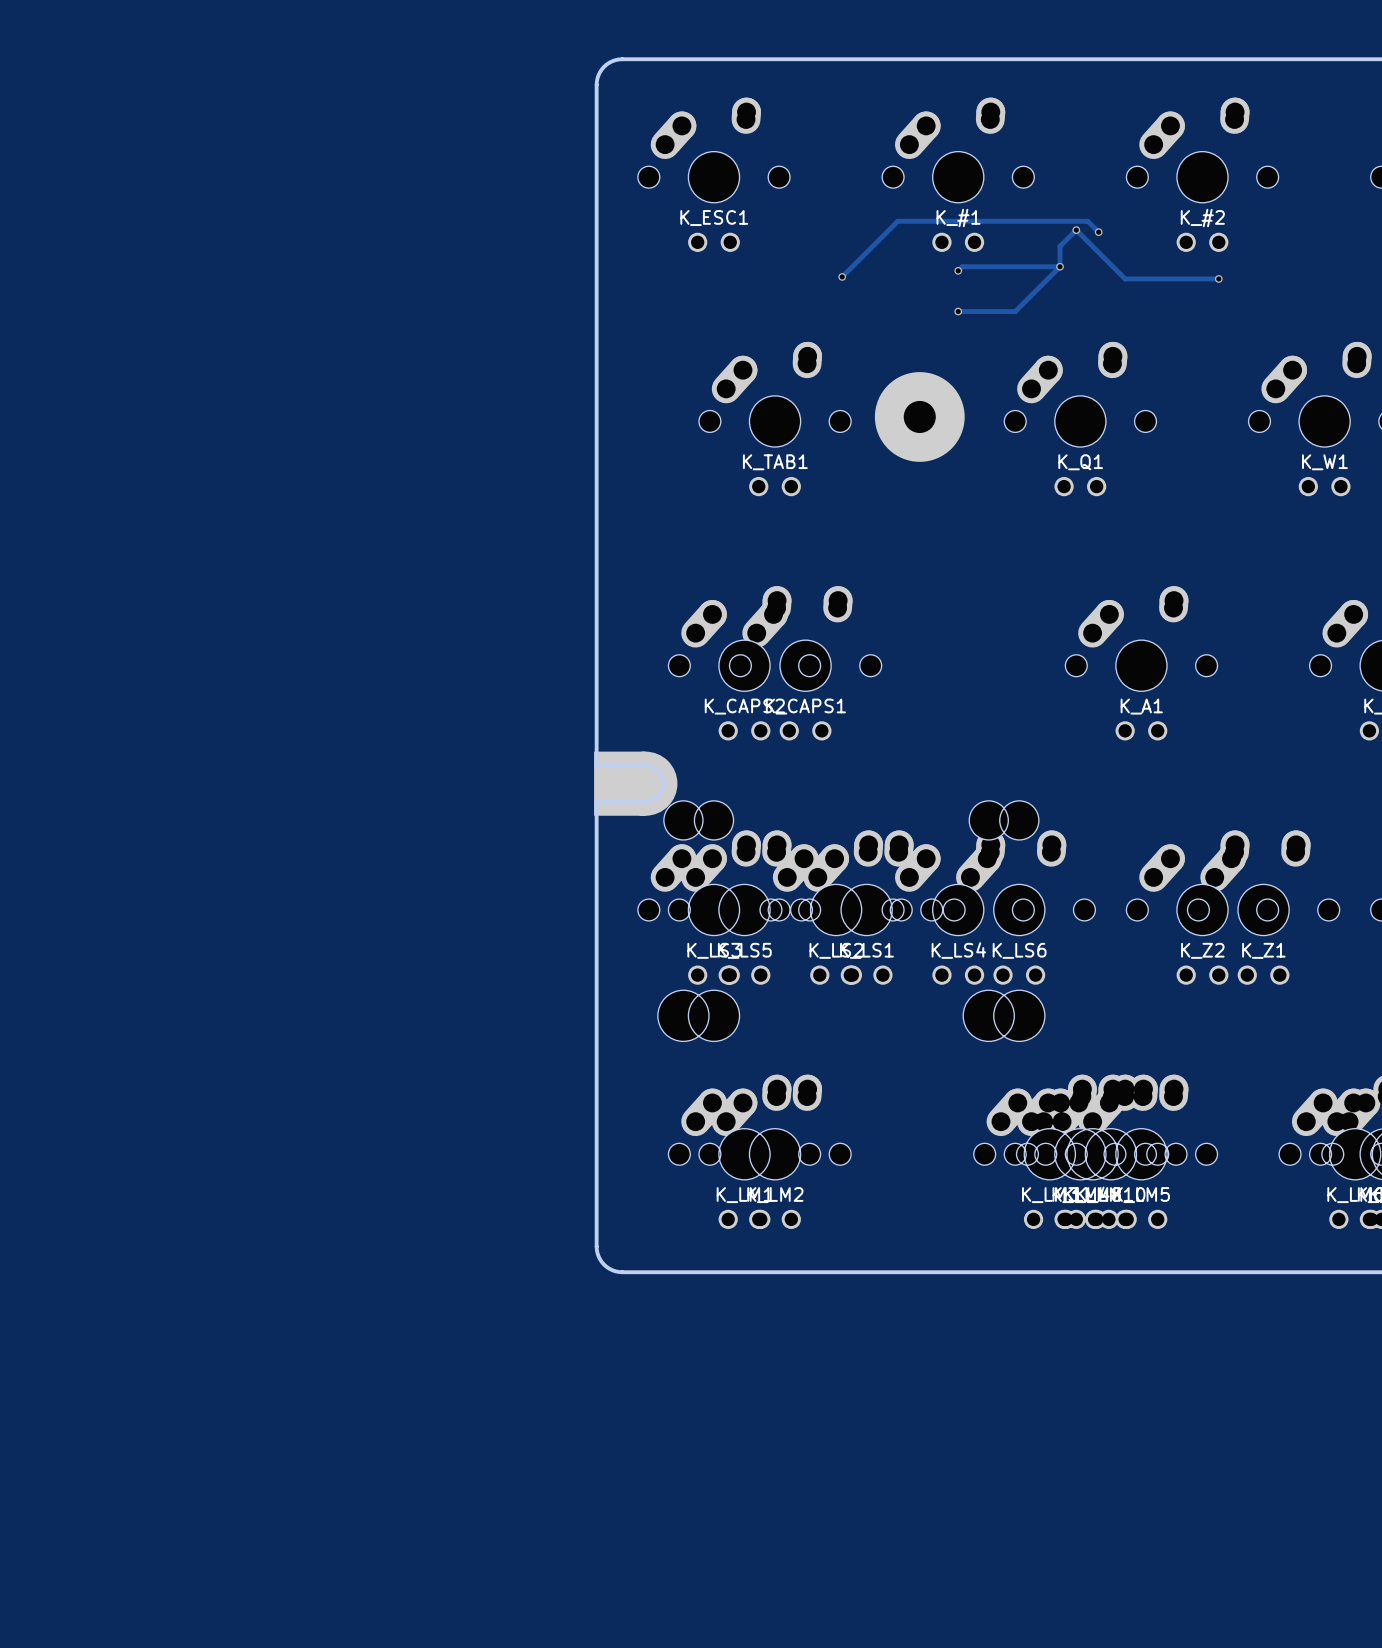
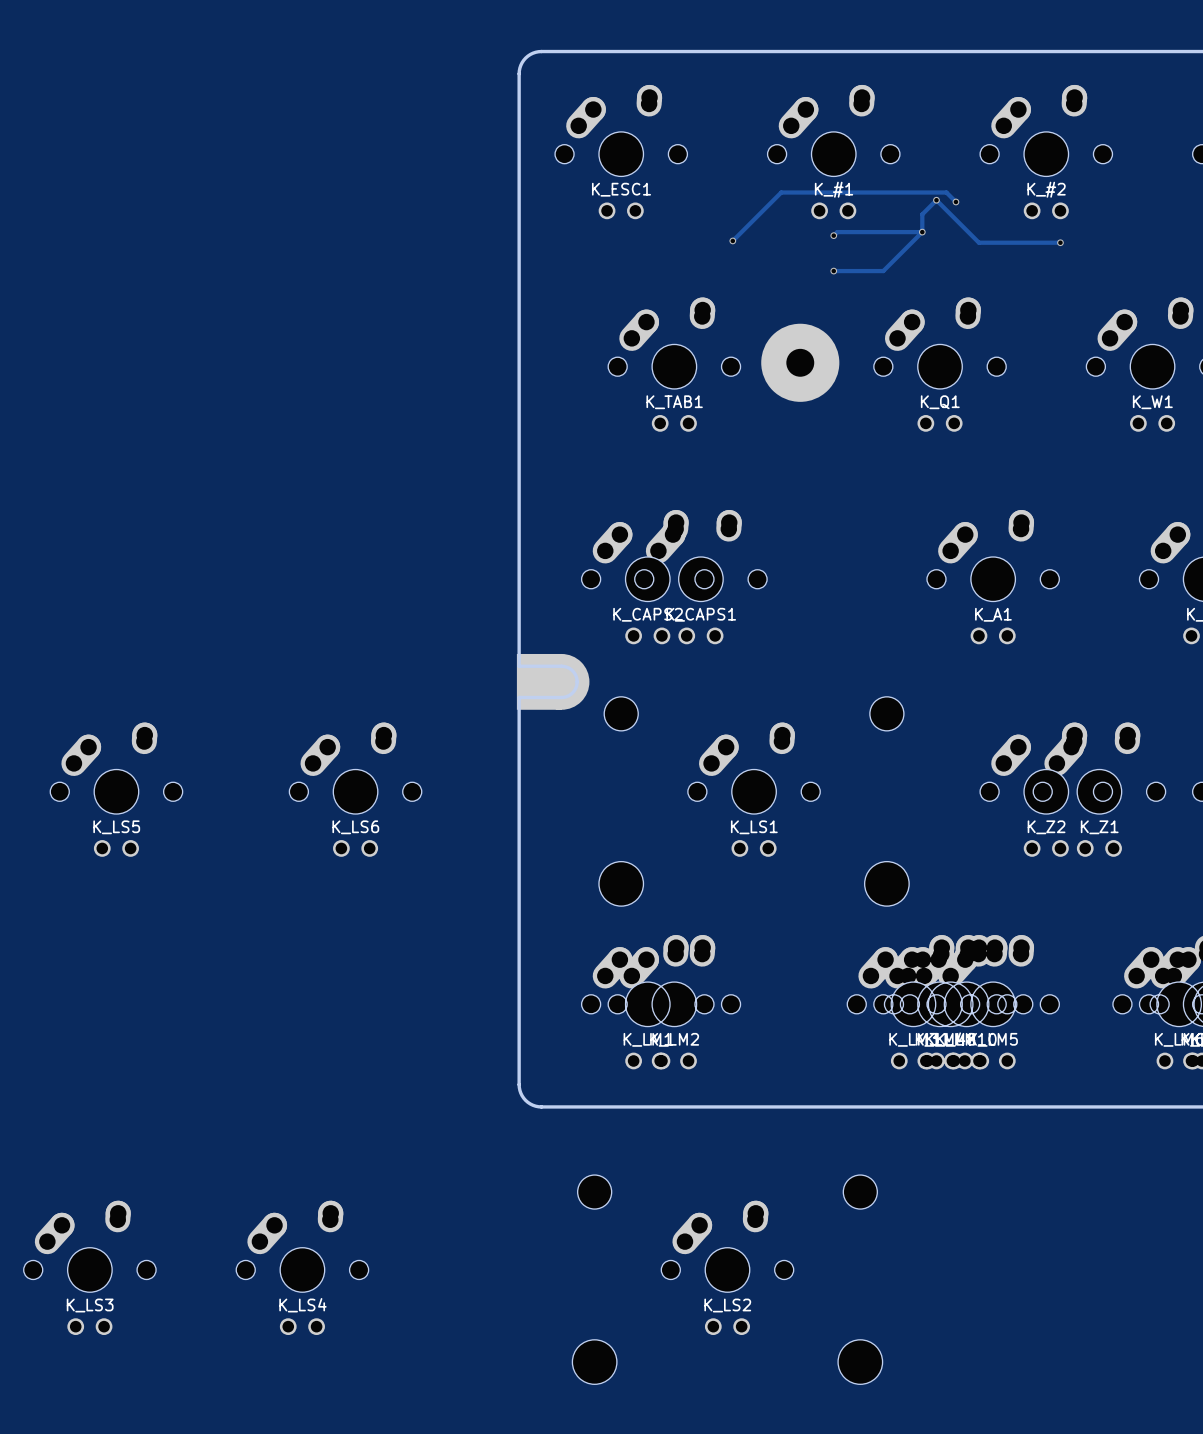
K_LS3 position: (713, 907) -> (89, 1267)
K_LS5 position: (744, 907) -> (116, 789)
K_LS4 position: (958, 907) -> (302, 1267)
K_LS6 position: (1019, 907) -> (355, 789)
K_LS2 position: (836, 921) -> (727, 1279)

